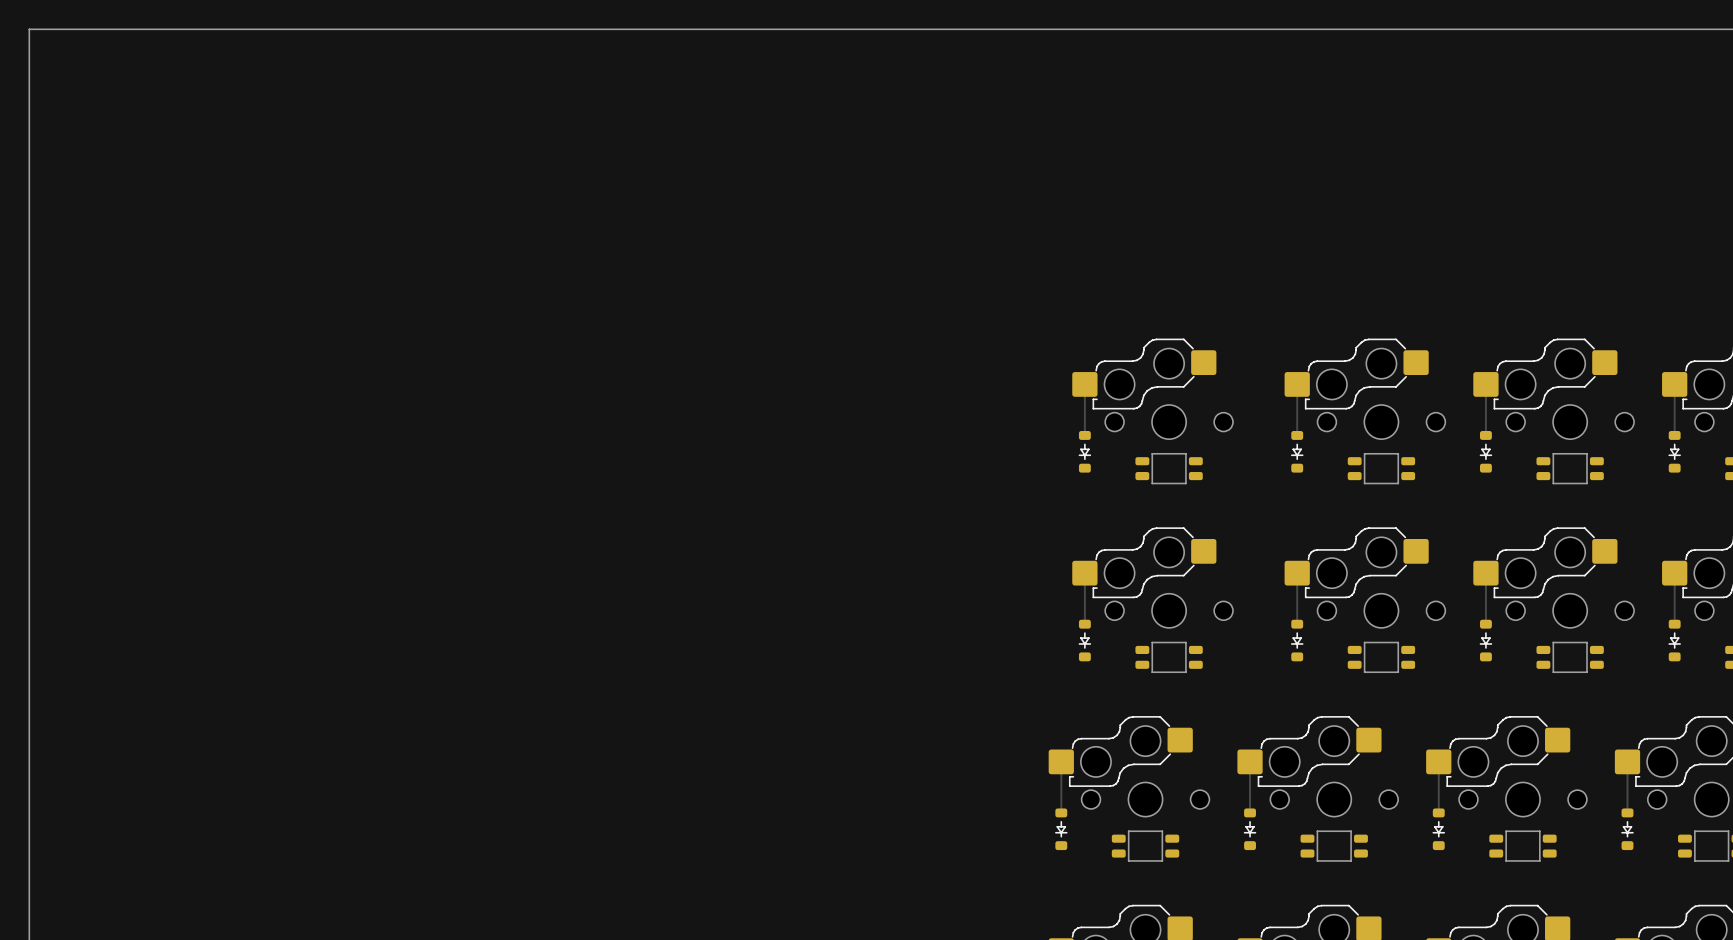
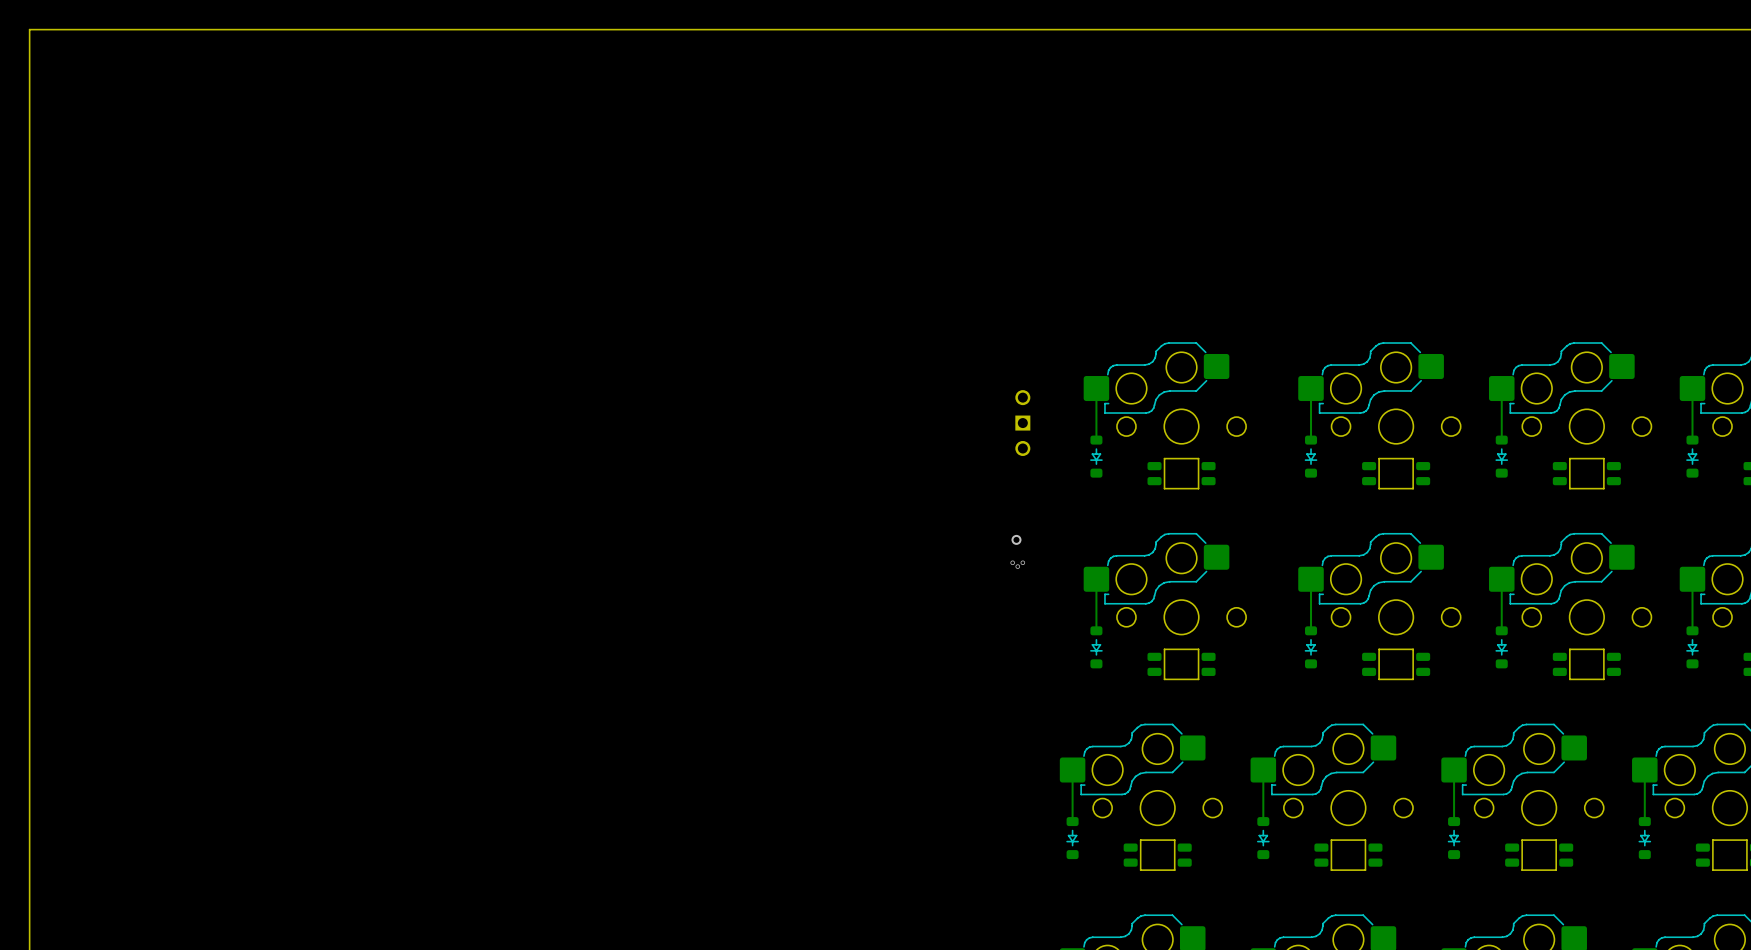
part: none -> (1022, 423)
via: none -> (1016, 539)
via: none -> (1012, 562)
via: none -> (1022, 562)
via: none -> (1017, 566)

